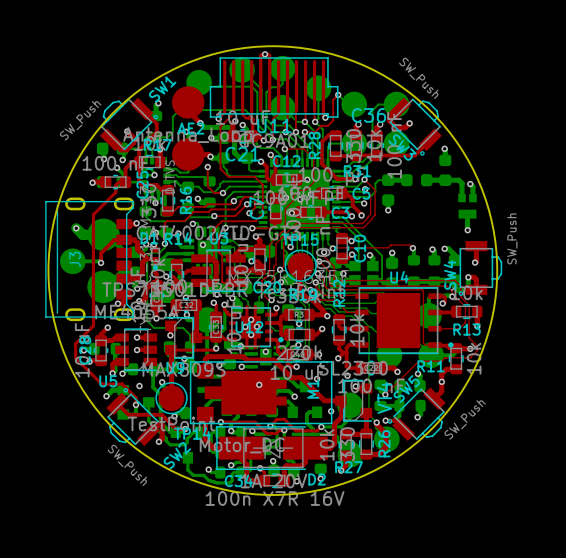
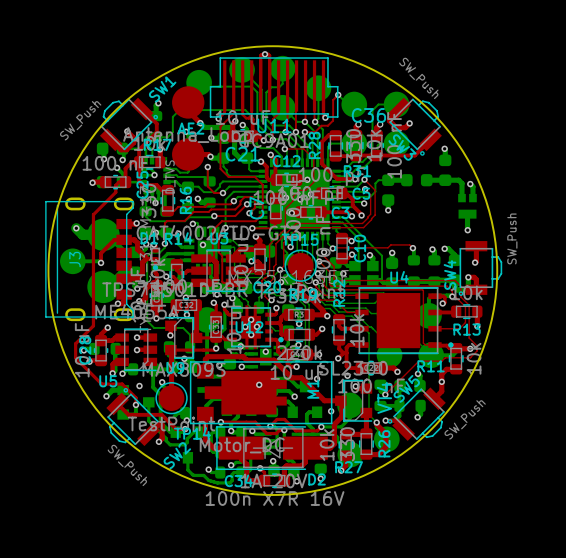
via position: (174, 416) -> (186, 420)

